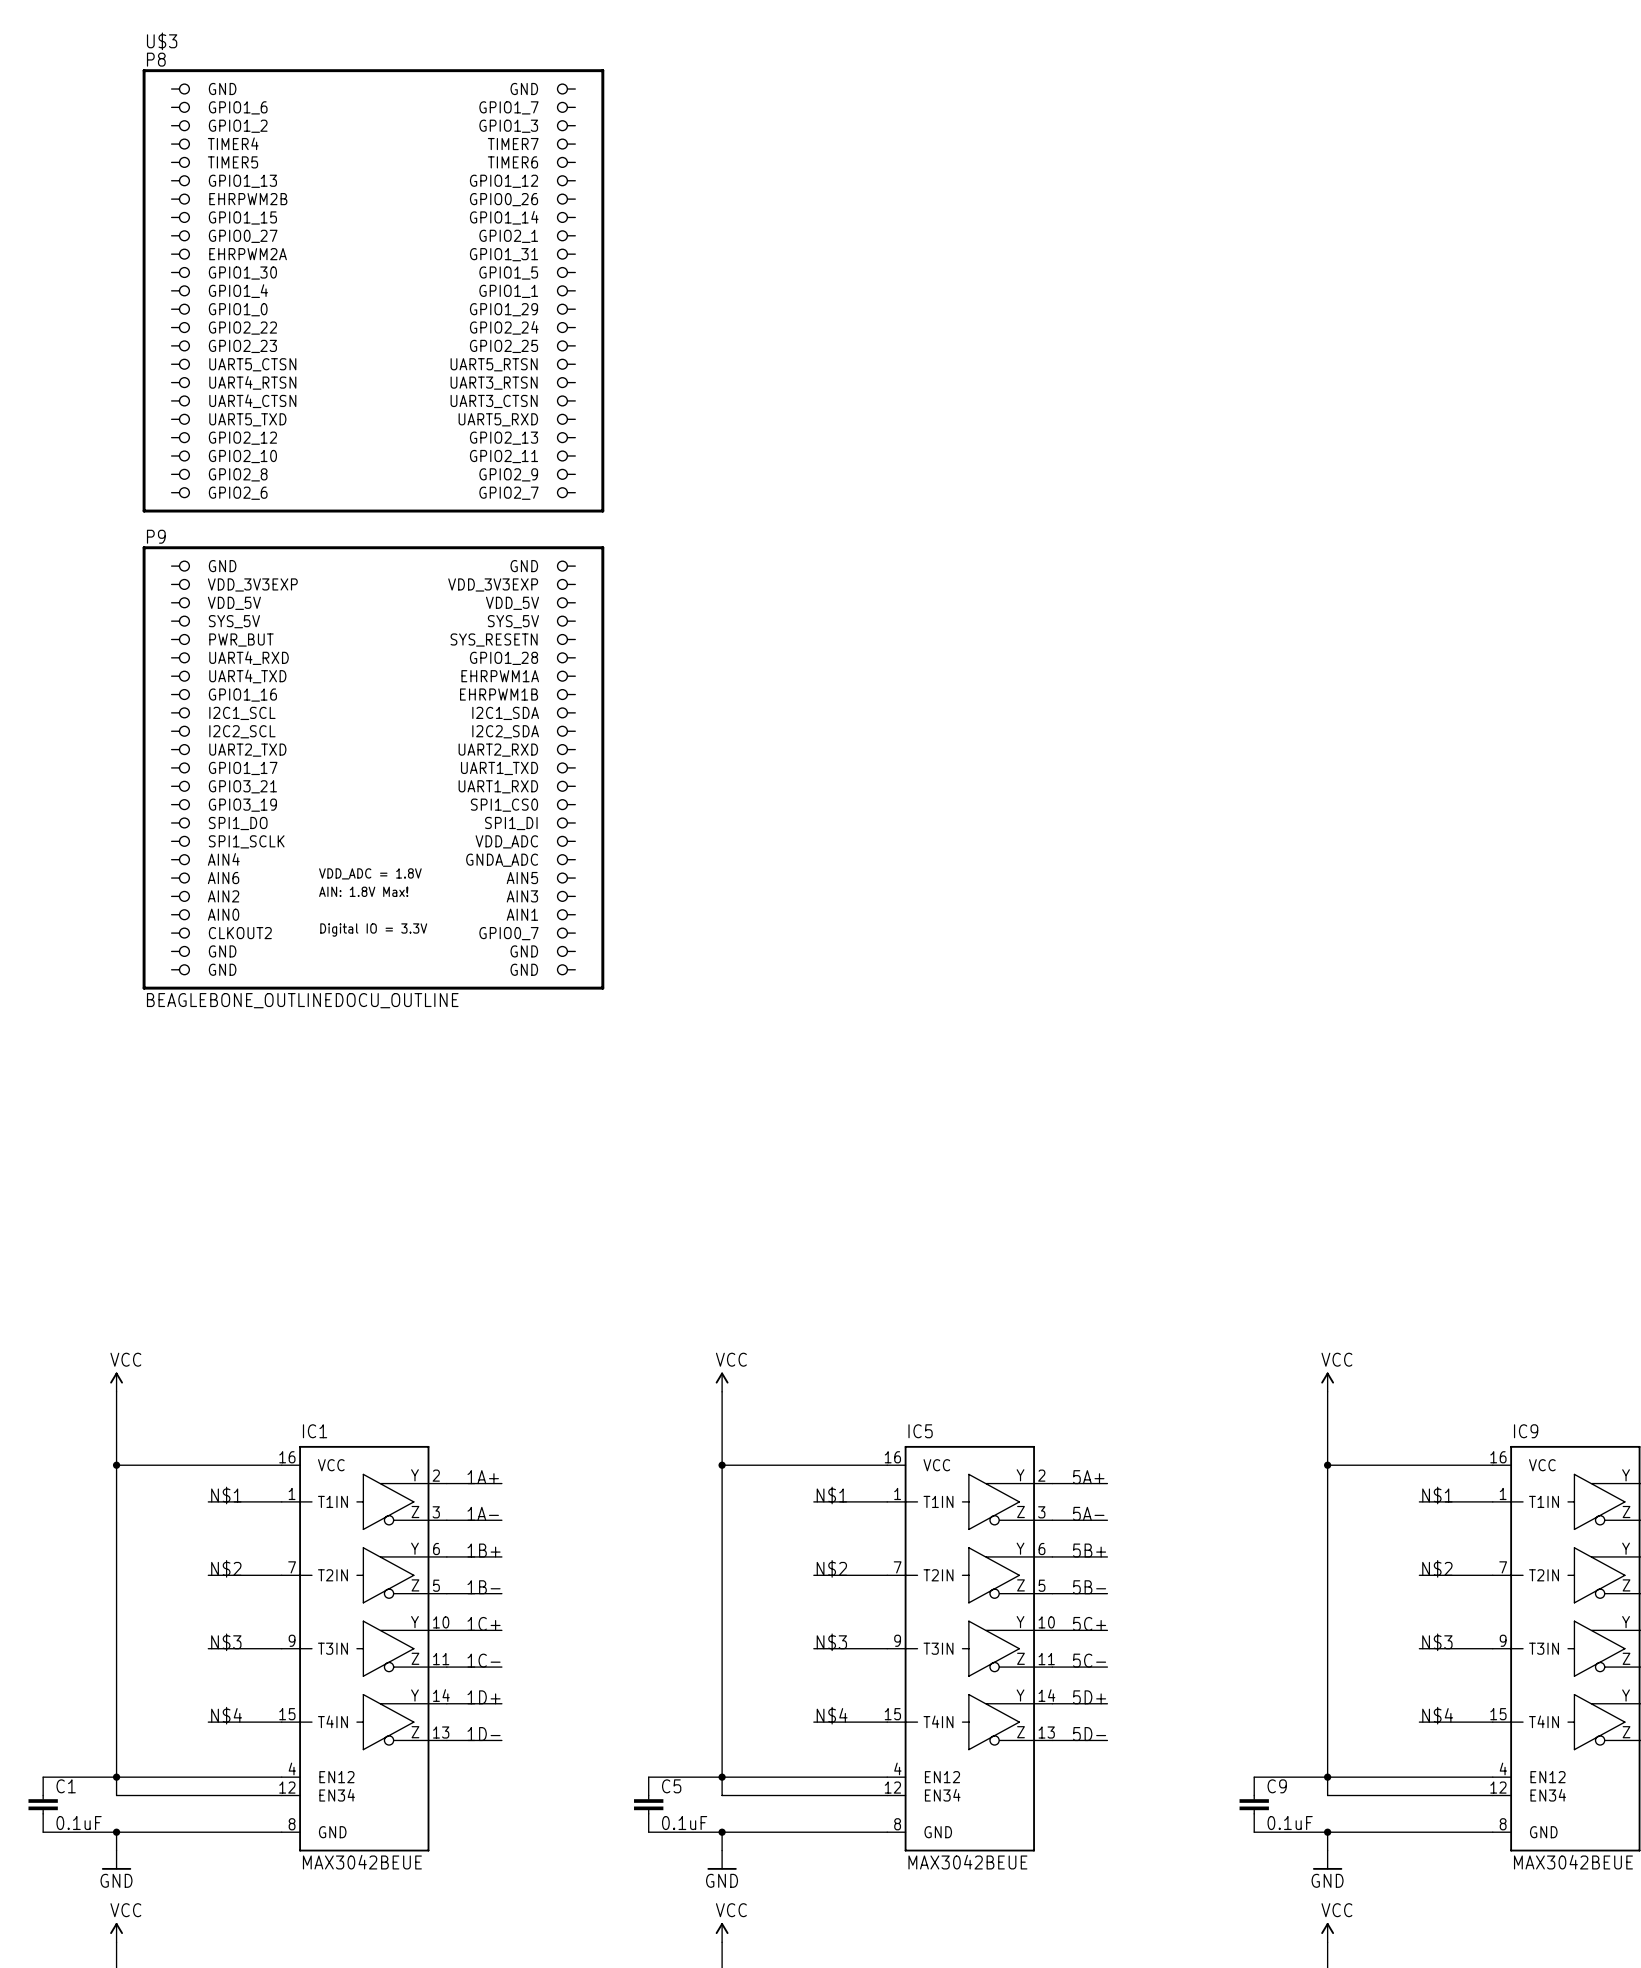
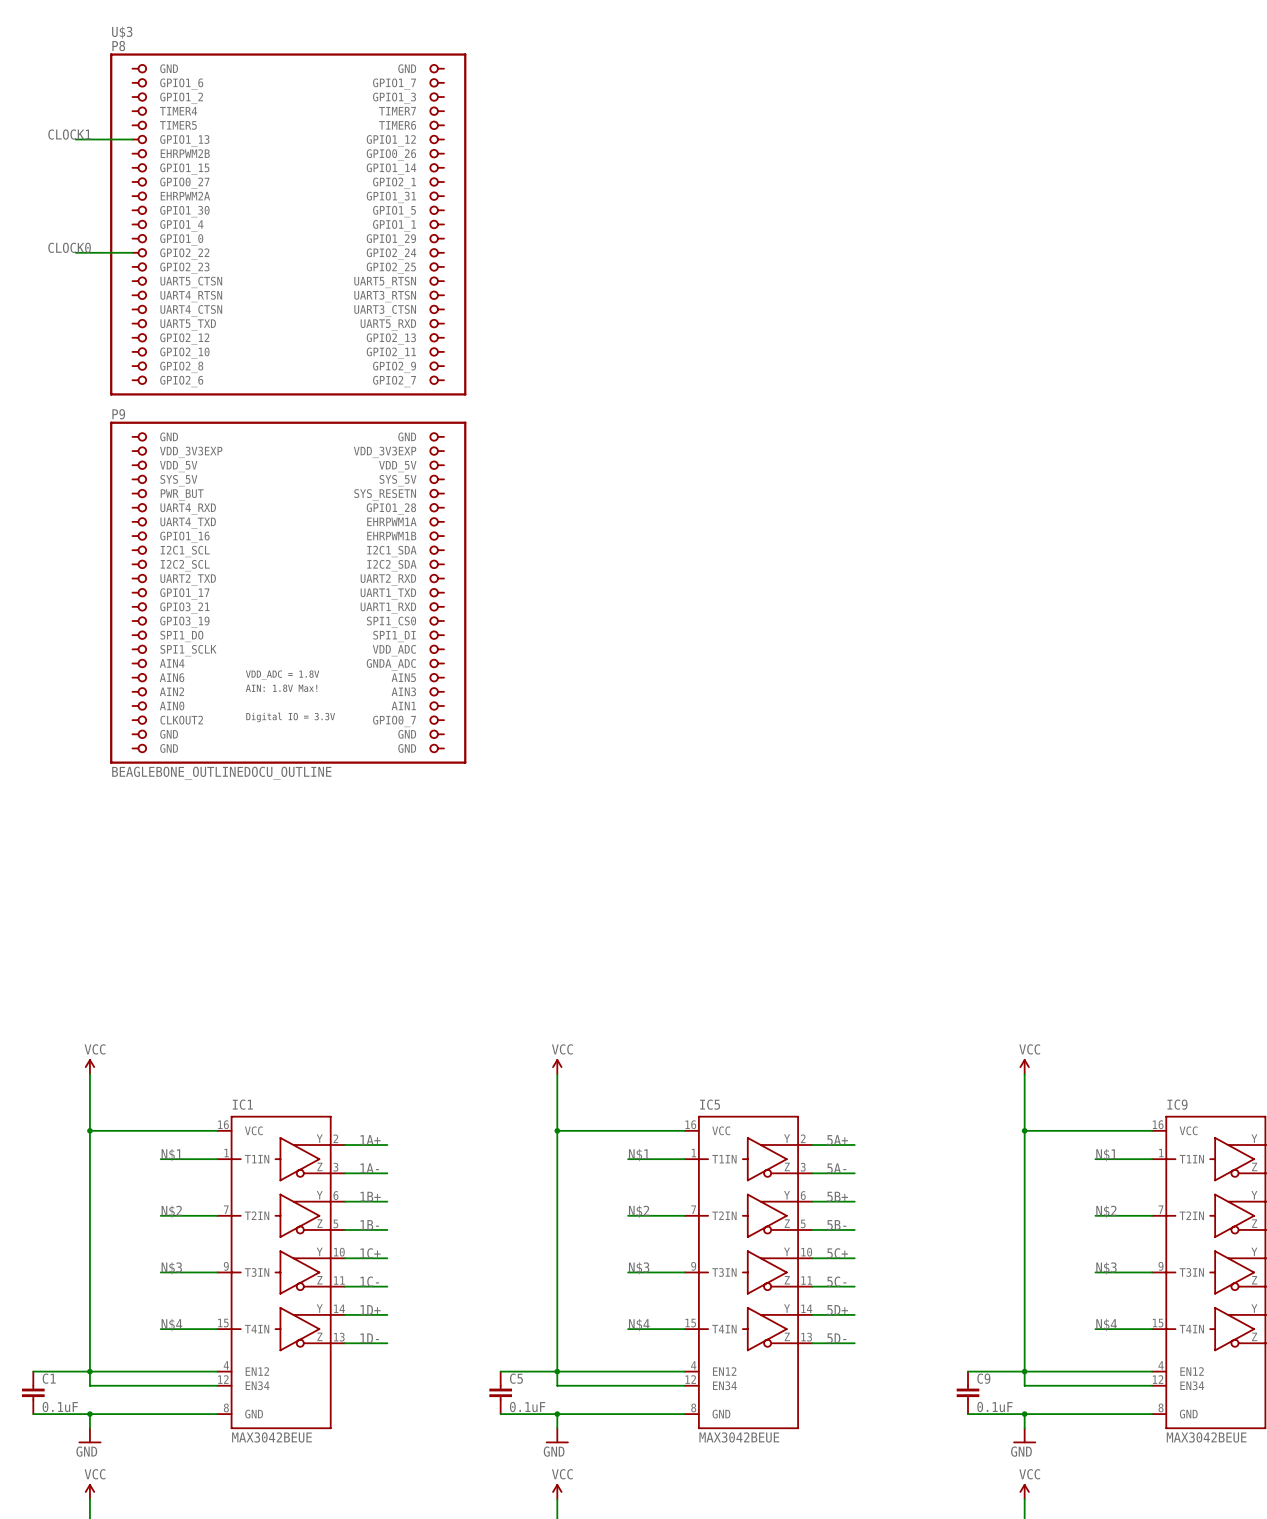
label: none -> CLOCK1 (69, 134)
wire: none -> (75, 139) (132, 139)
label: none -> CLOCK0 (69, 247)
wire: none -> (75, 252) (132, 252)

